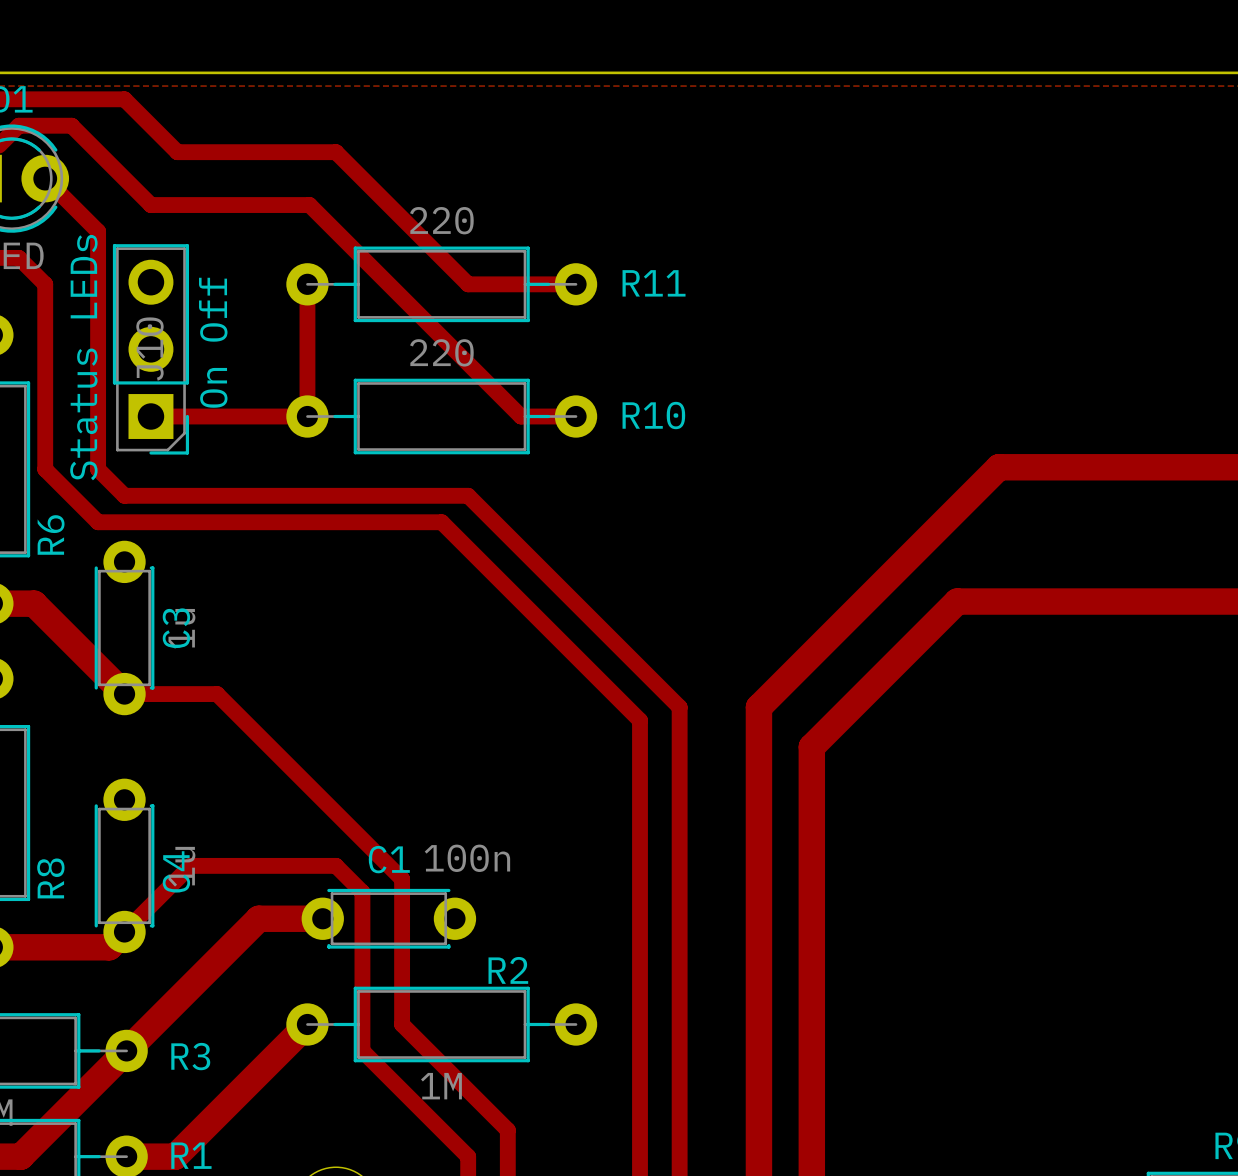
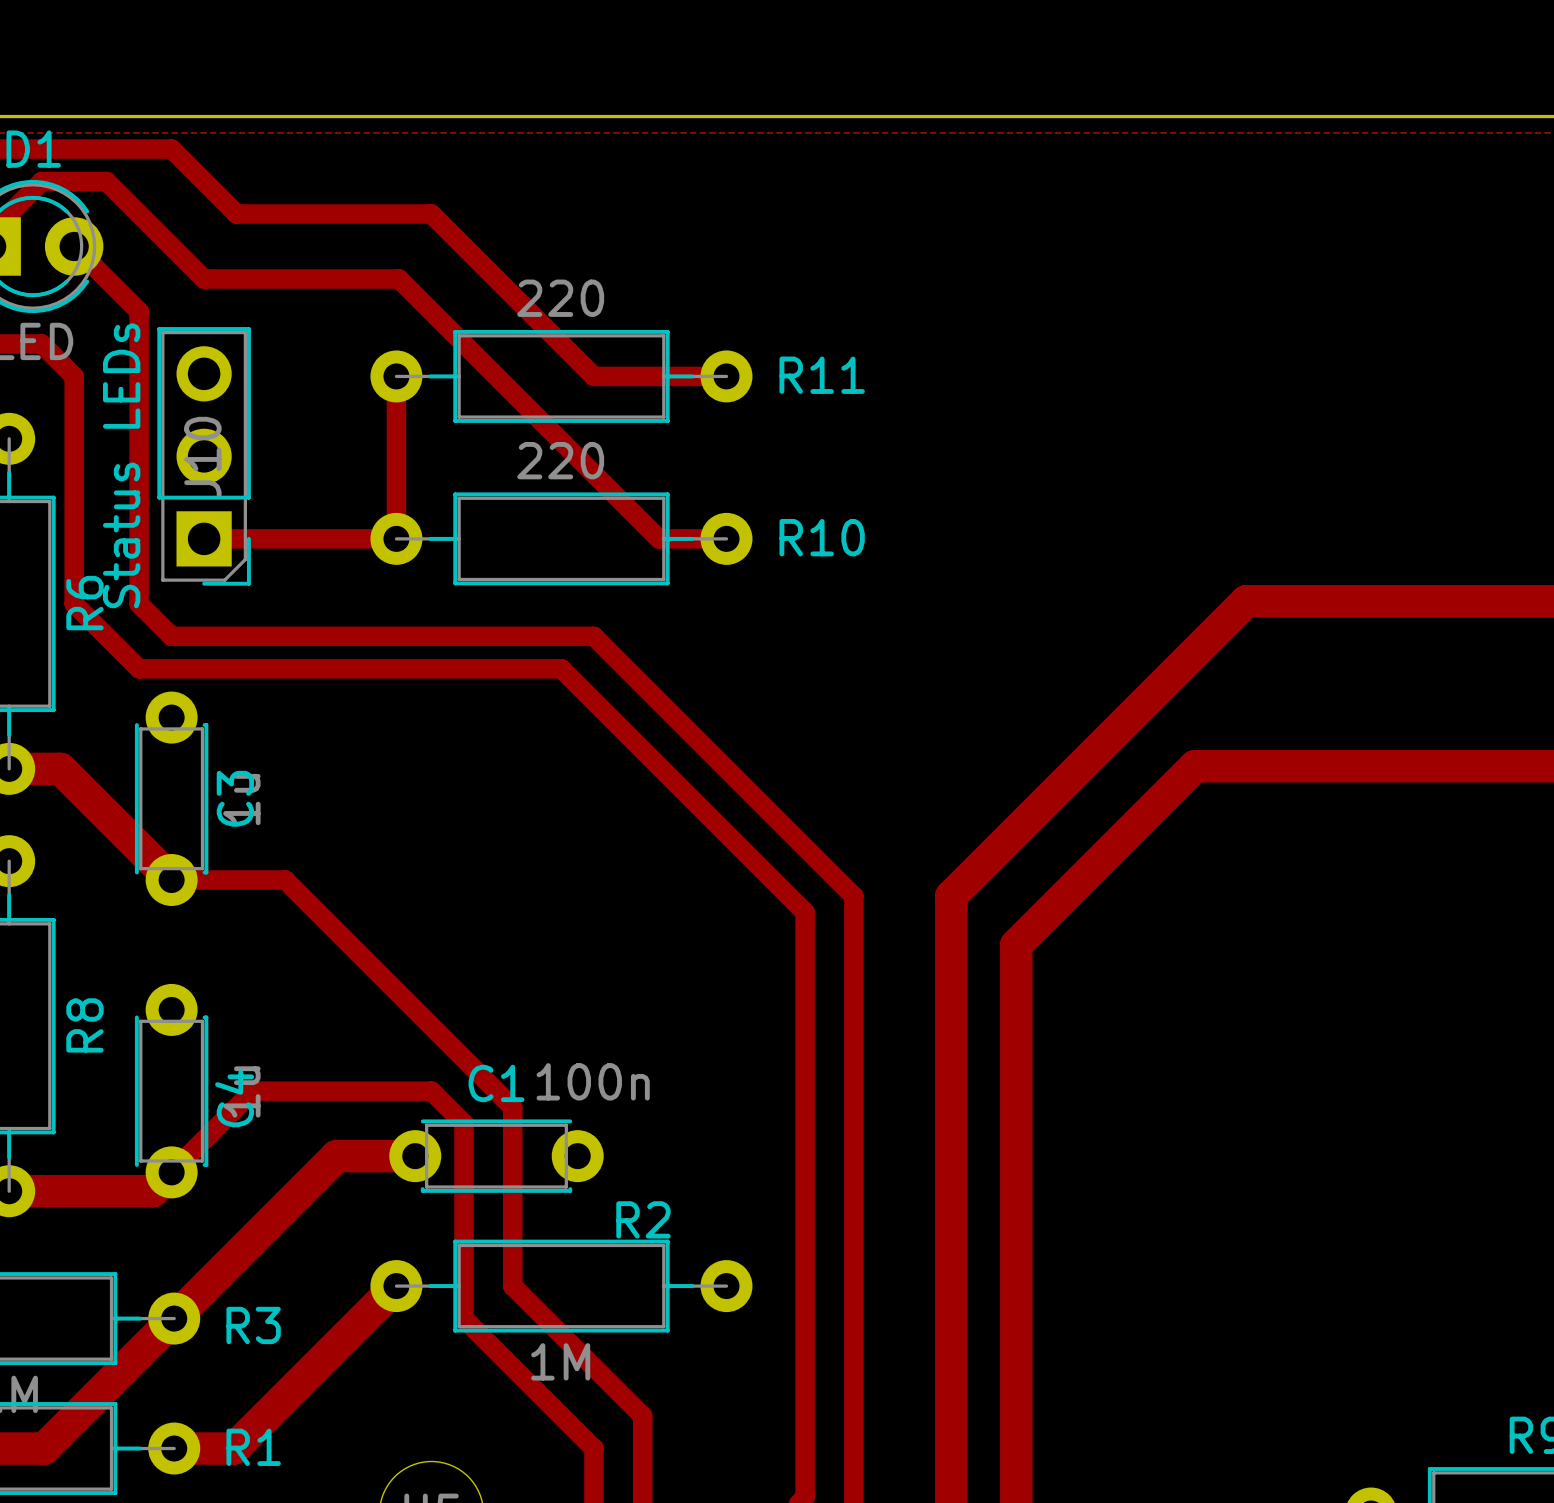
text: Off (213, 309) -> none
text: On (213, 387) -> none
R6 name position: R6 (51, 534) -> R6 (84, 603)
R8 name position: R8 (50, 878) -> R8 (84, 1025)

